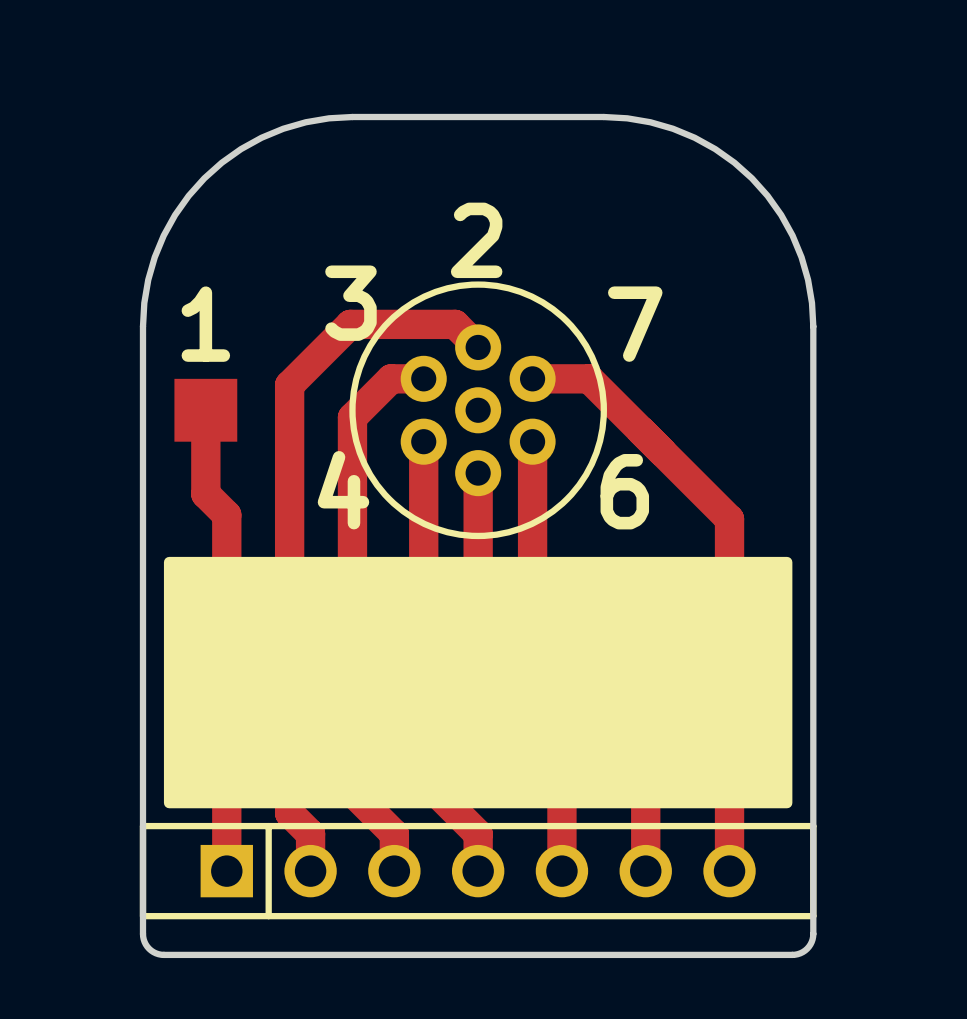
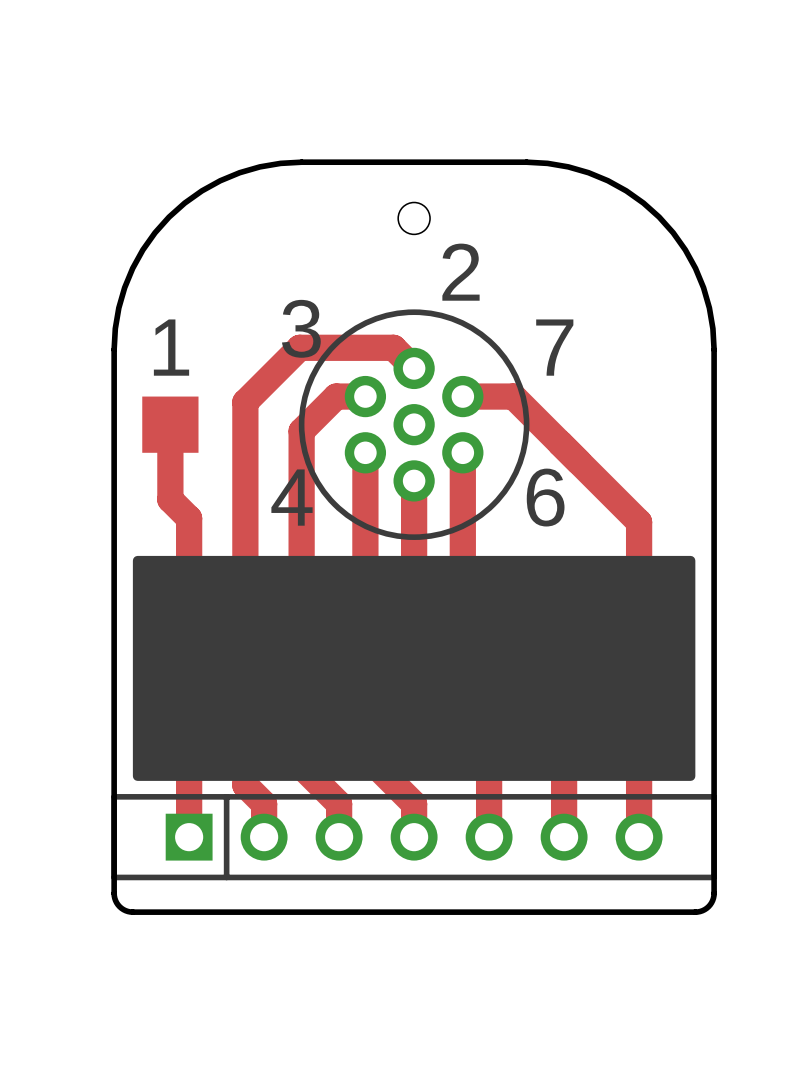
text position: 2 (476, 240) -> 2 (460, 272)
part: none -> (414, 371)

